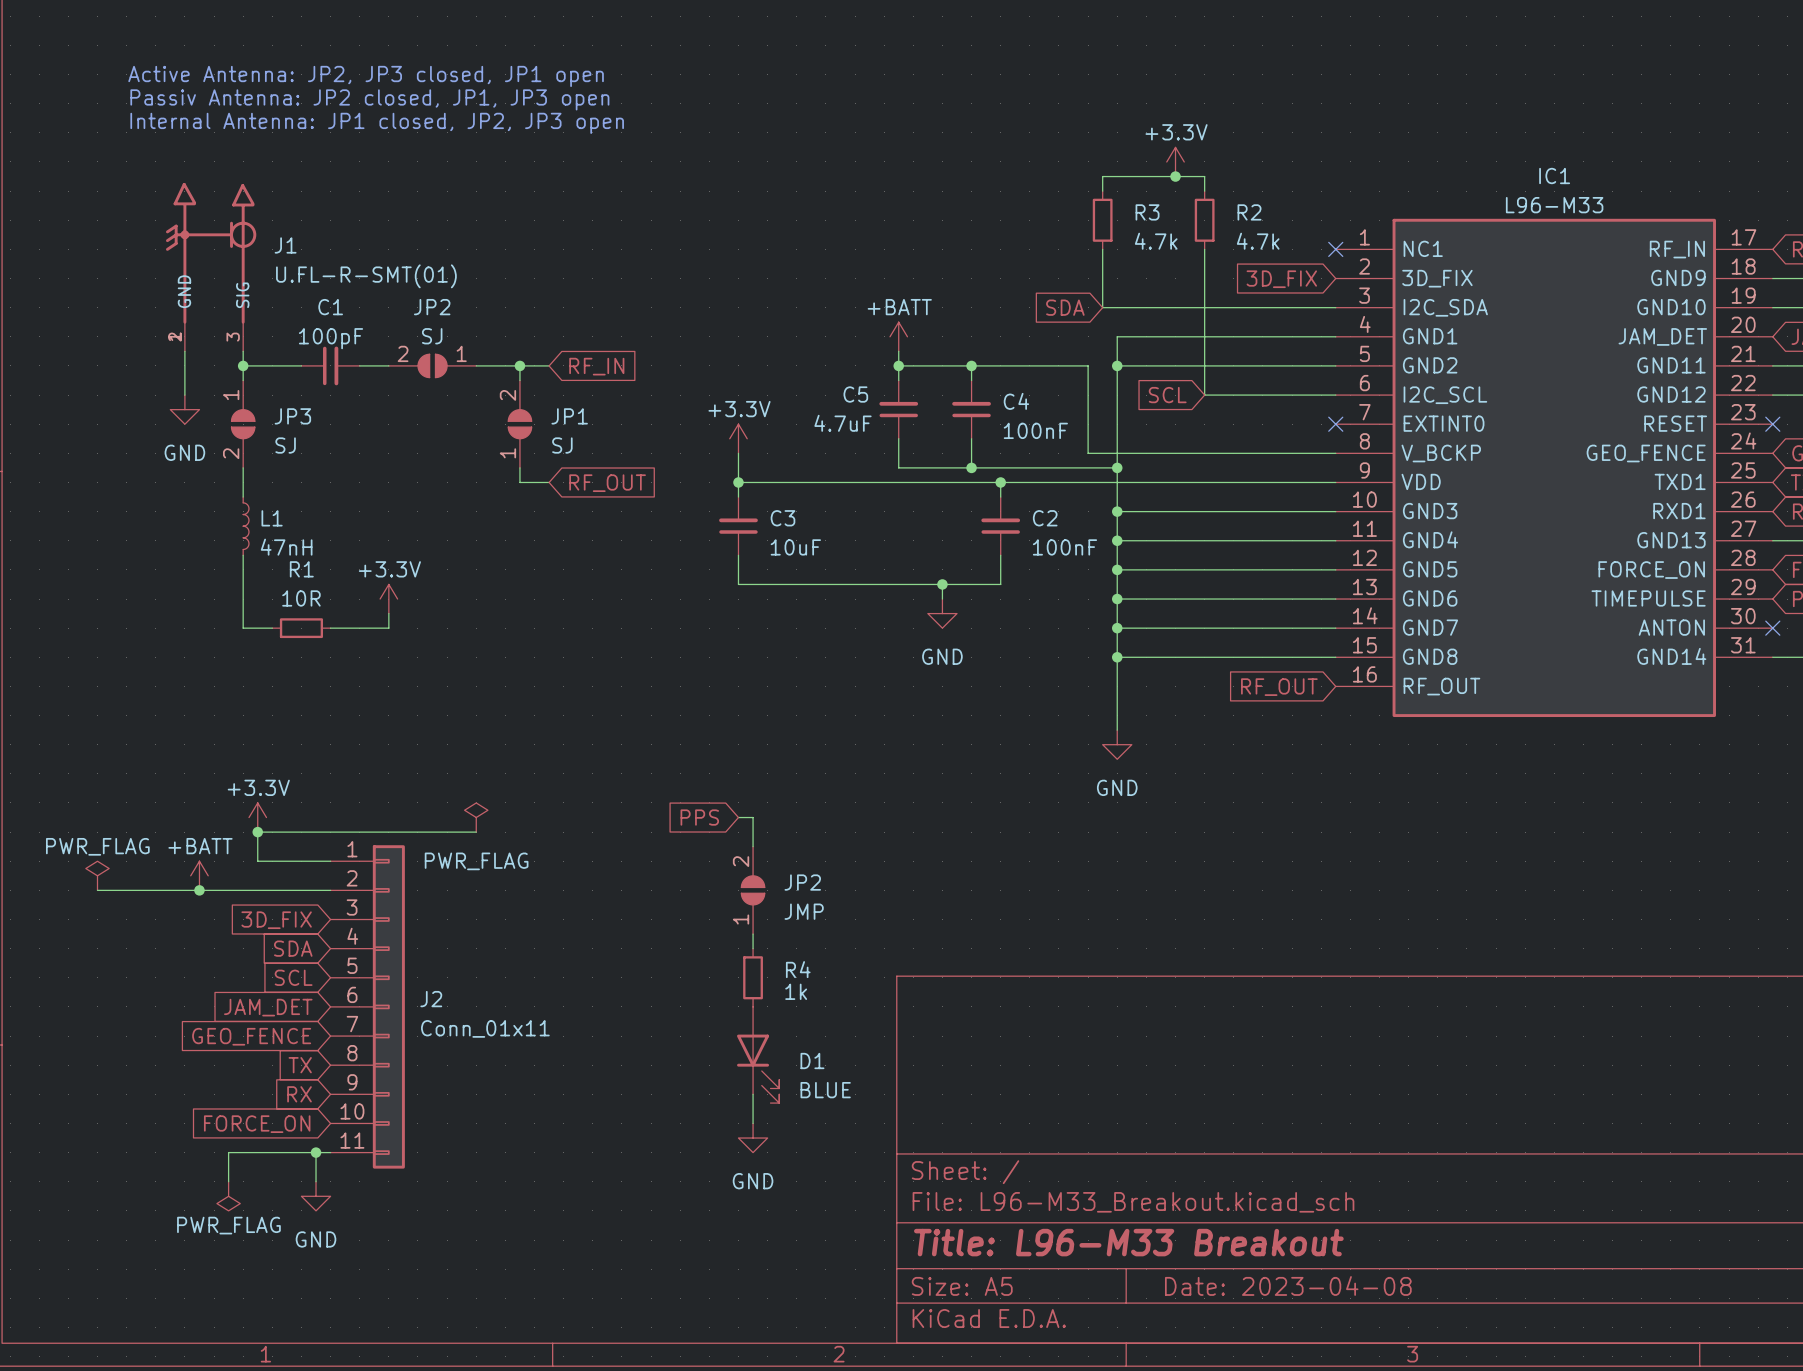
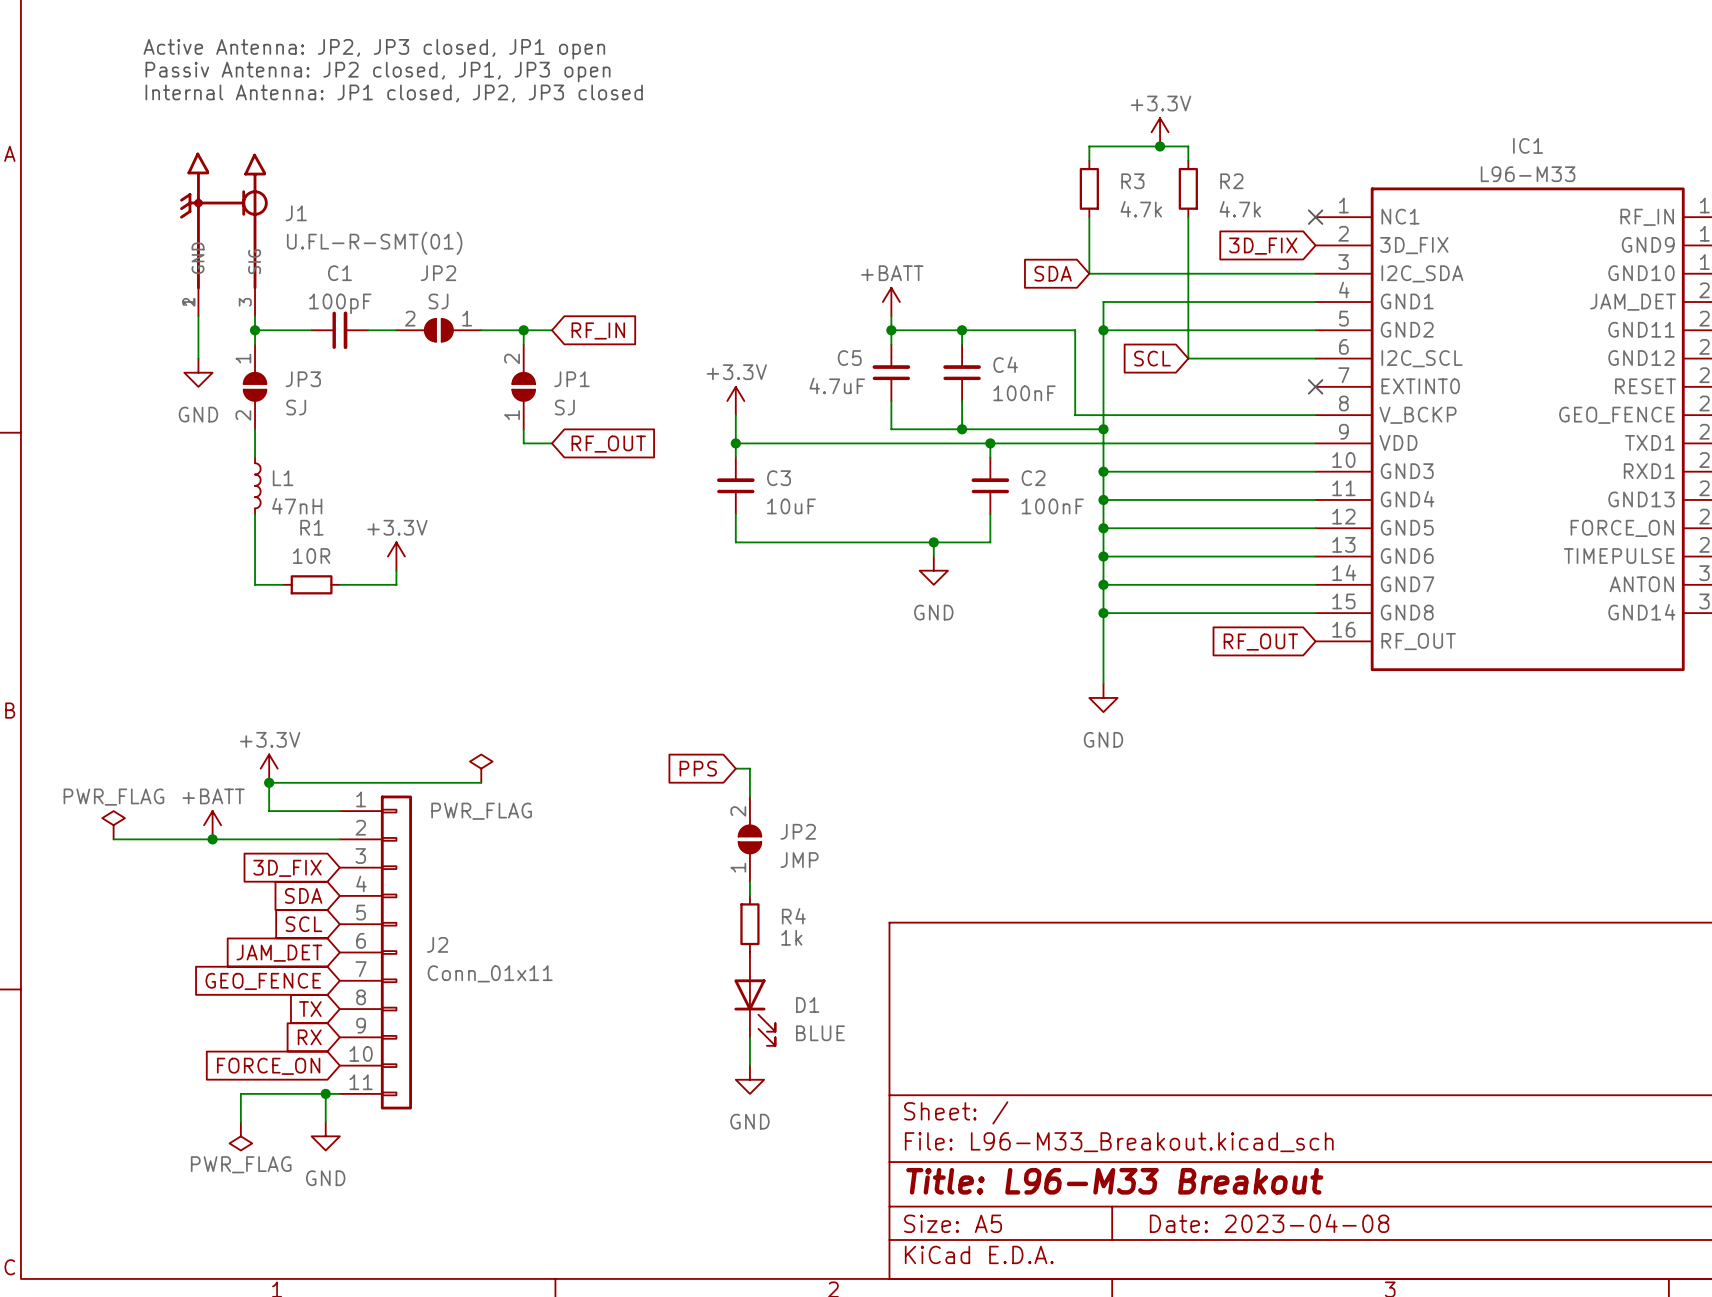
text: Internal Antenna: JP1 closed, JP2, JP3 open (377, 123) -> Internal Antenna: JP1 closed, JP2, JP3 closed (394, 93)

